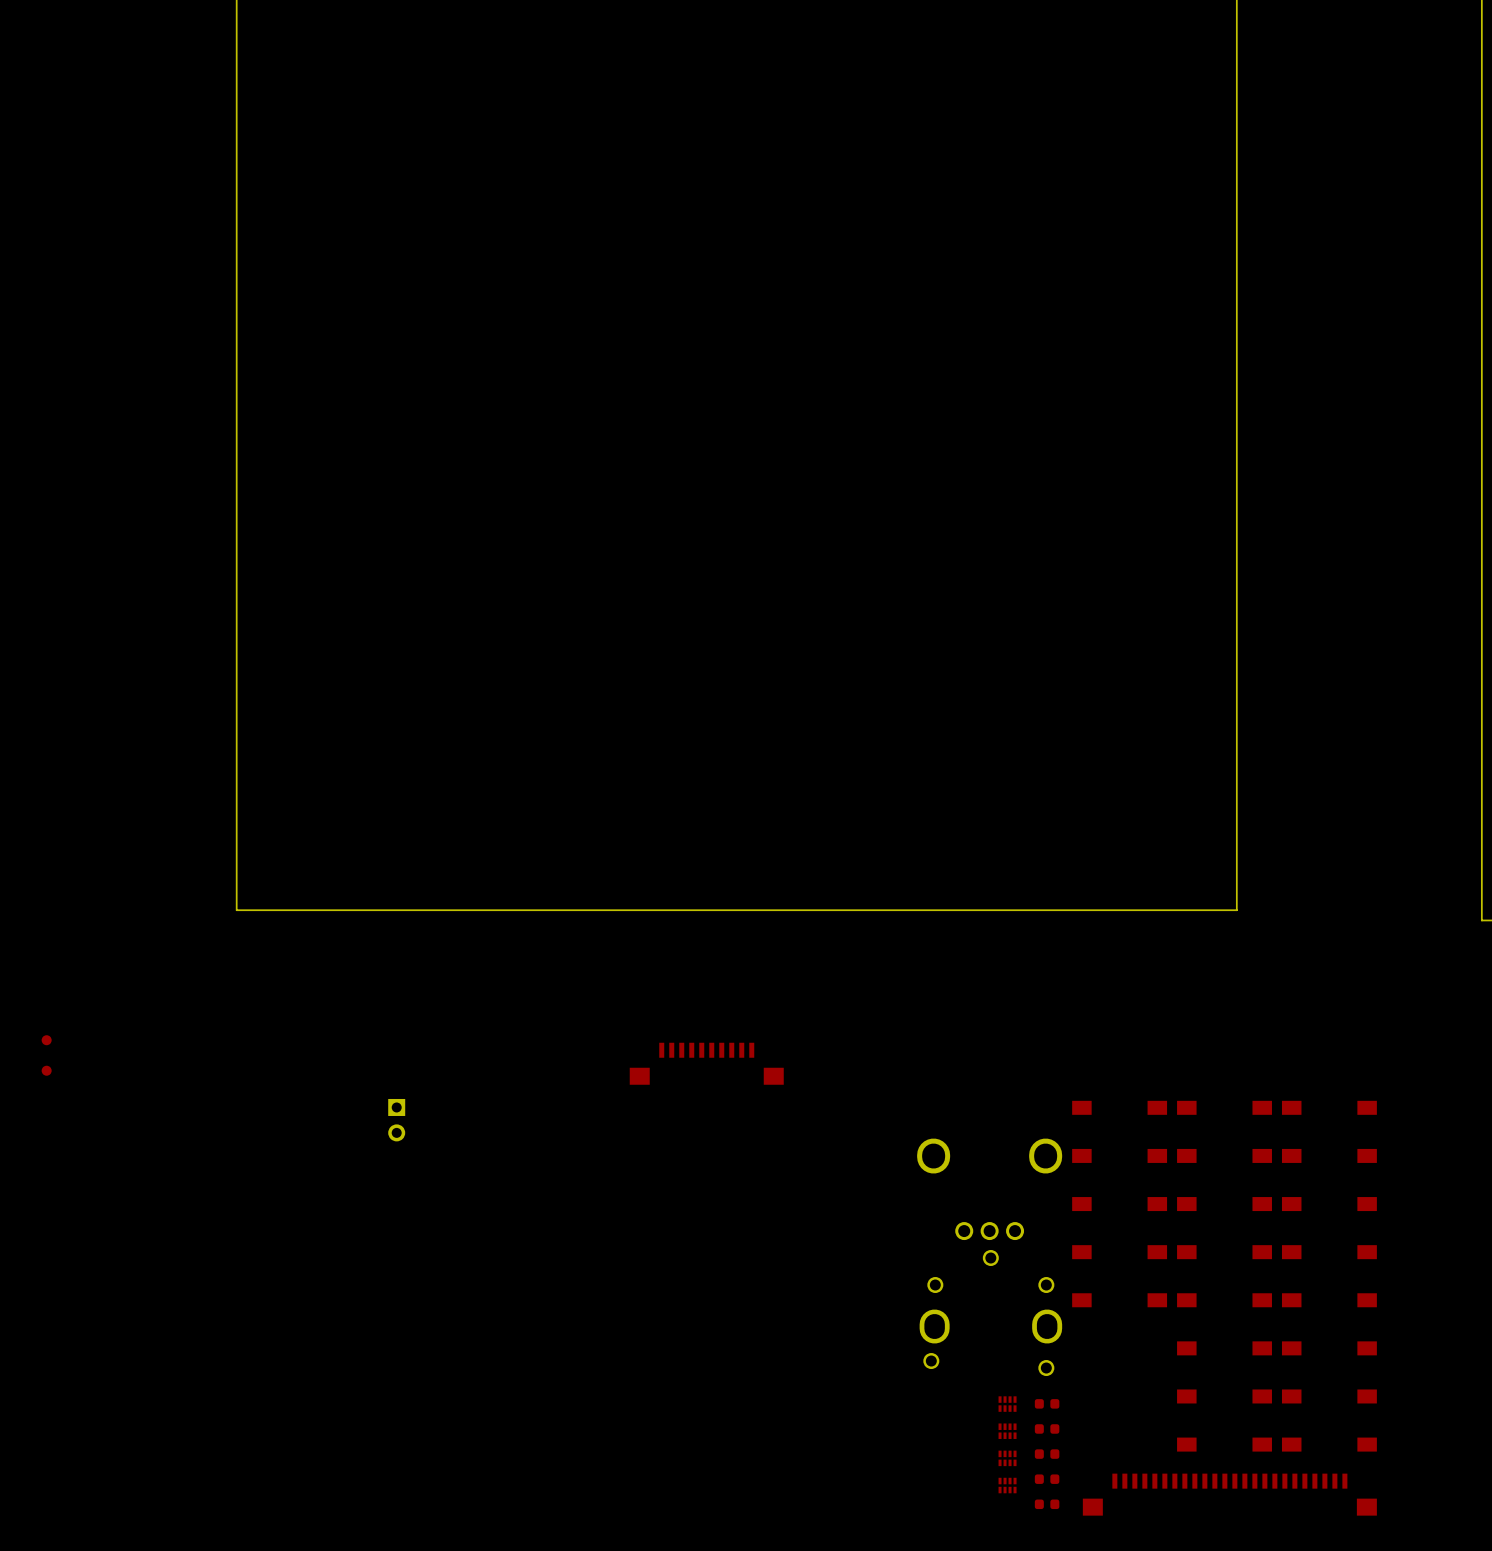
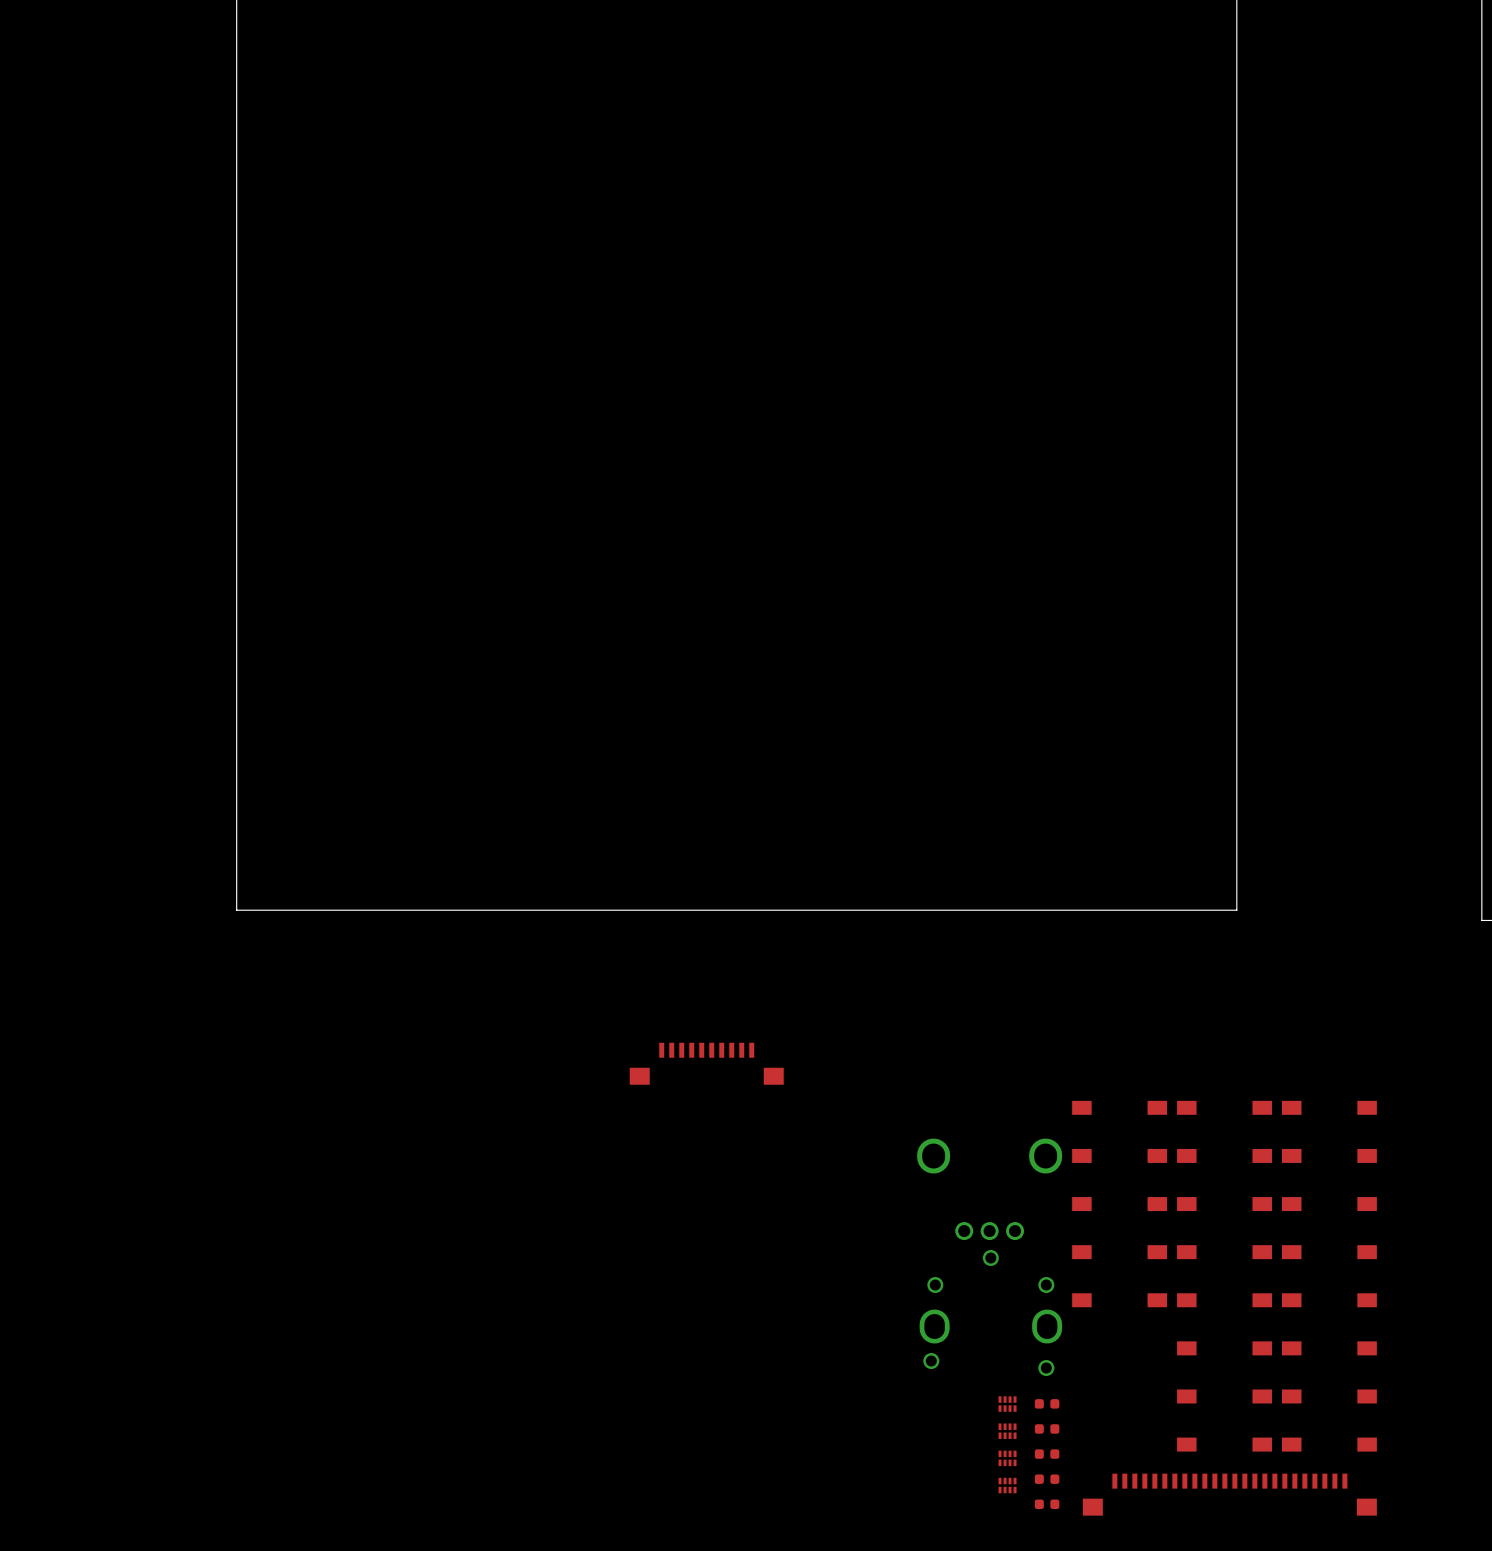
part: (46, 1040) -> none
part: (46, 1070) -> none
part: (396, 1120) -> none

